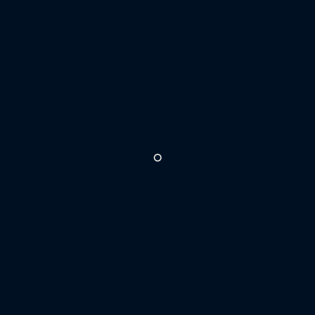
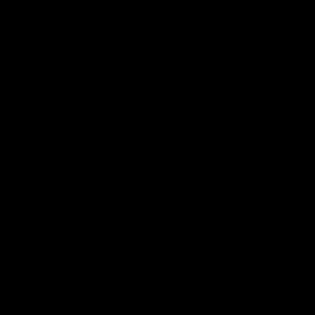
round board edge: [154, 154, 161, 161] -> none

